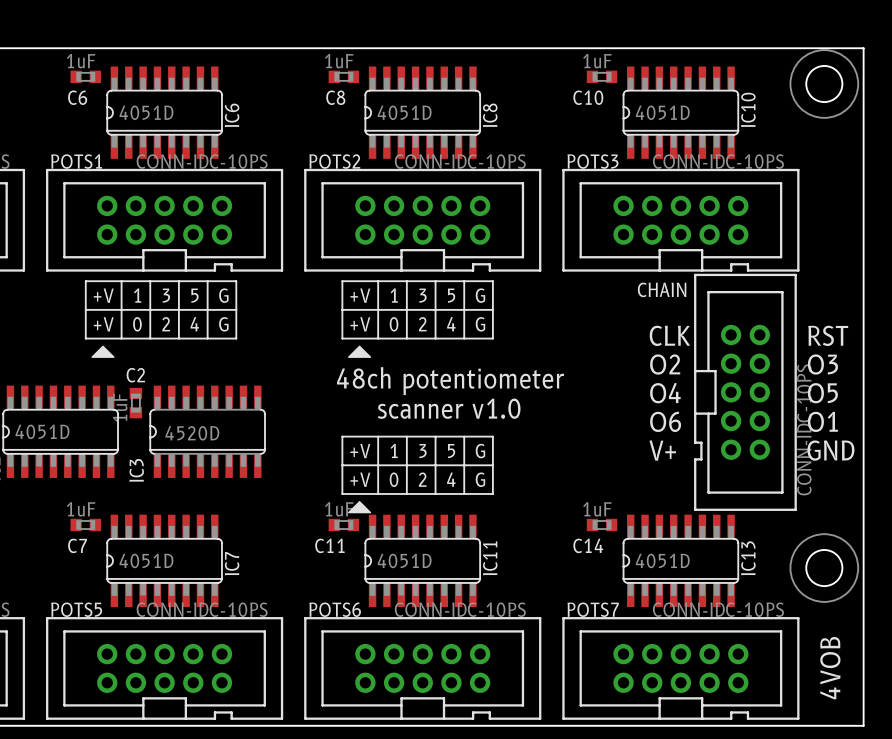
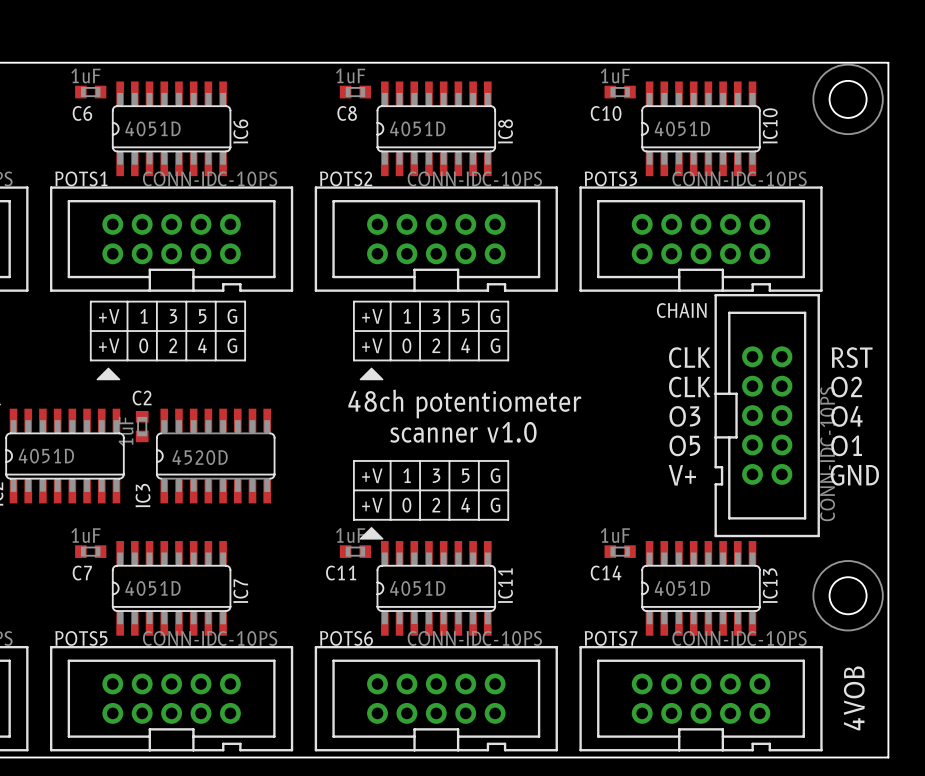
text: O2 (665, 364) -> CLK (689, 387)
text: O3 (822, 364) -> O2 (846, 387)
text: O4 (665, 393) -> O3 (684, 416)
text: O5 (822, 393) -> O4 (846, 416)
text: O6 (665, 421) -> O5 (684, 445)

